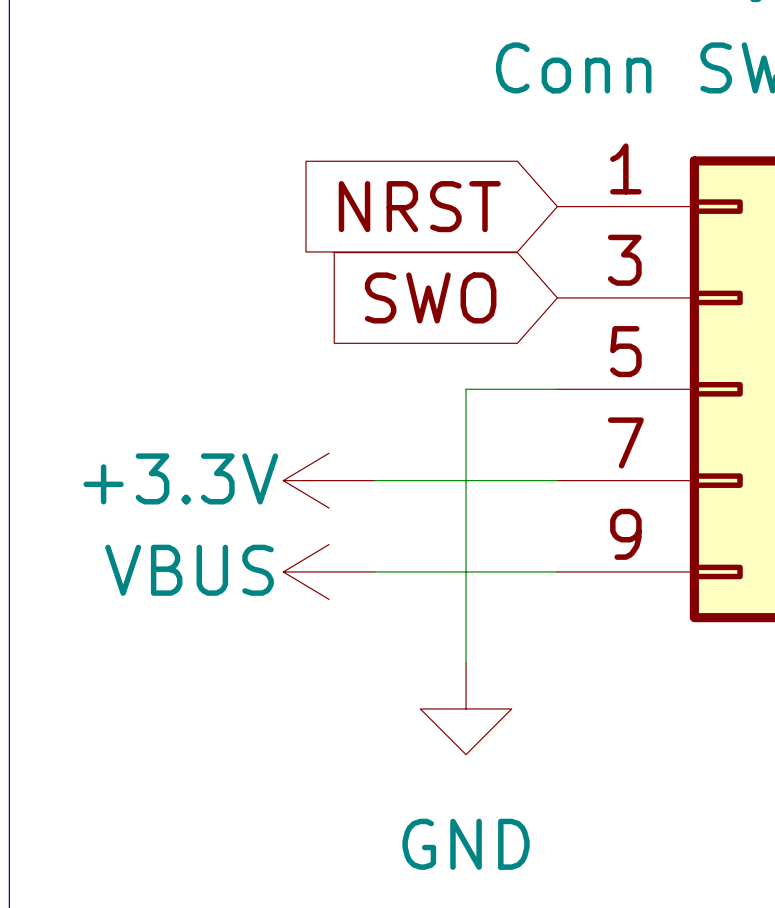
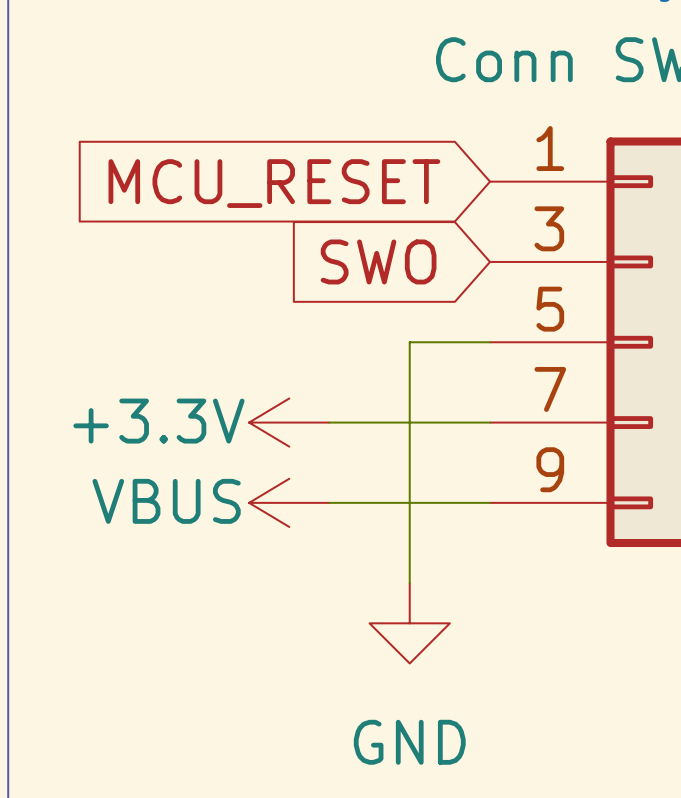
global label: NRST (419, 206) -> MCU_RESET (274, 183)

